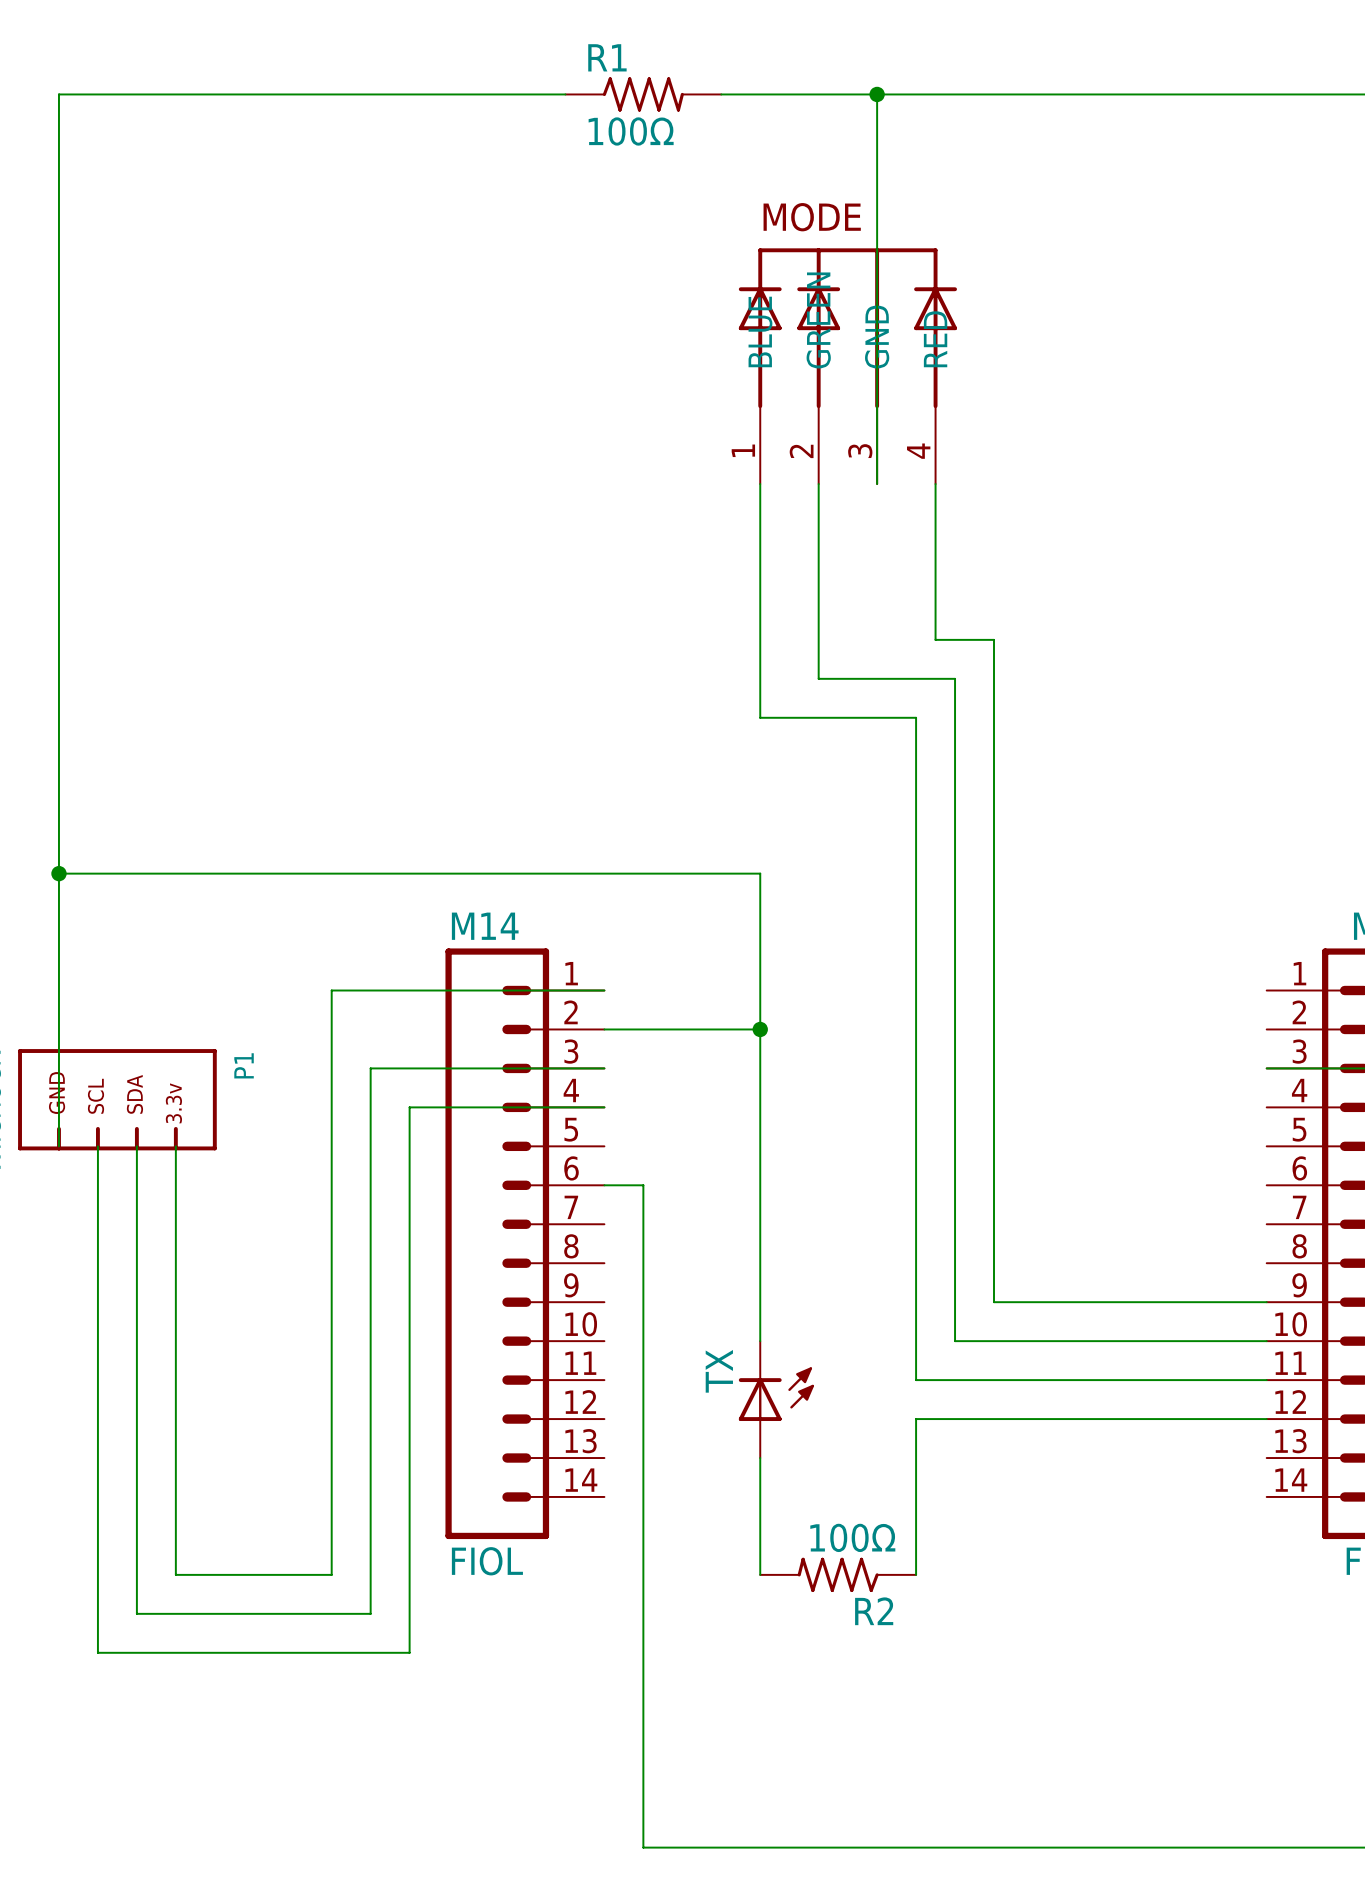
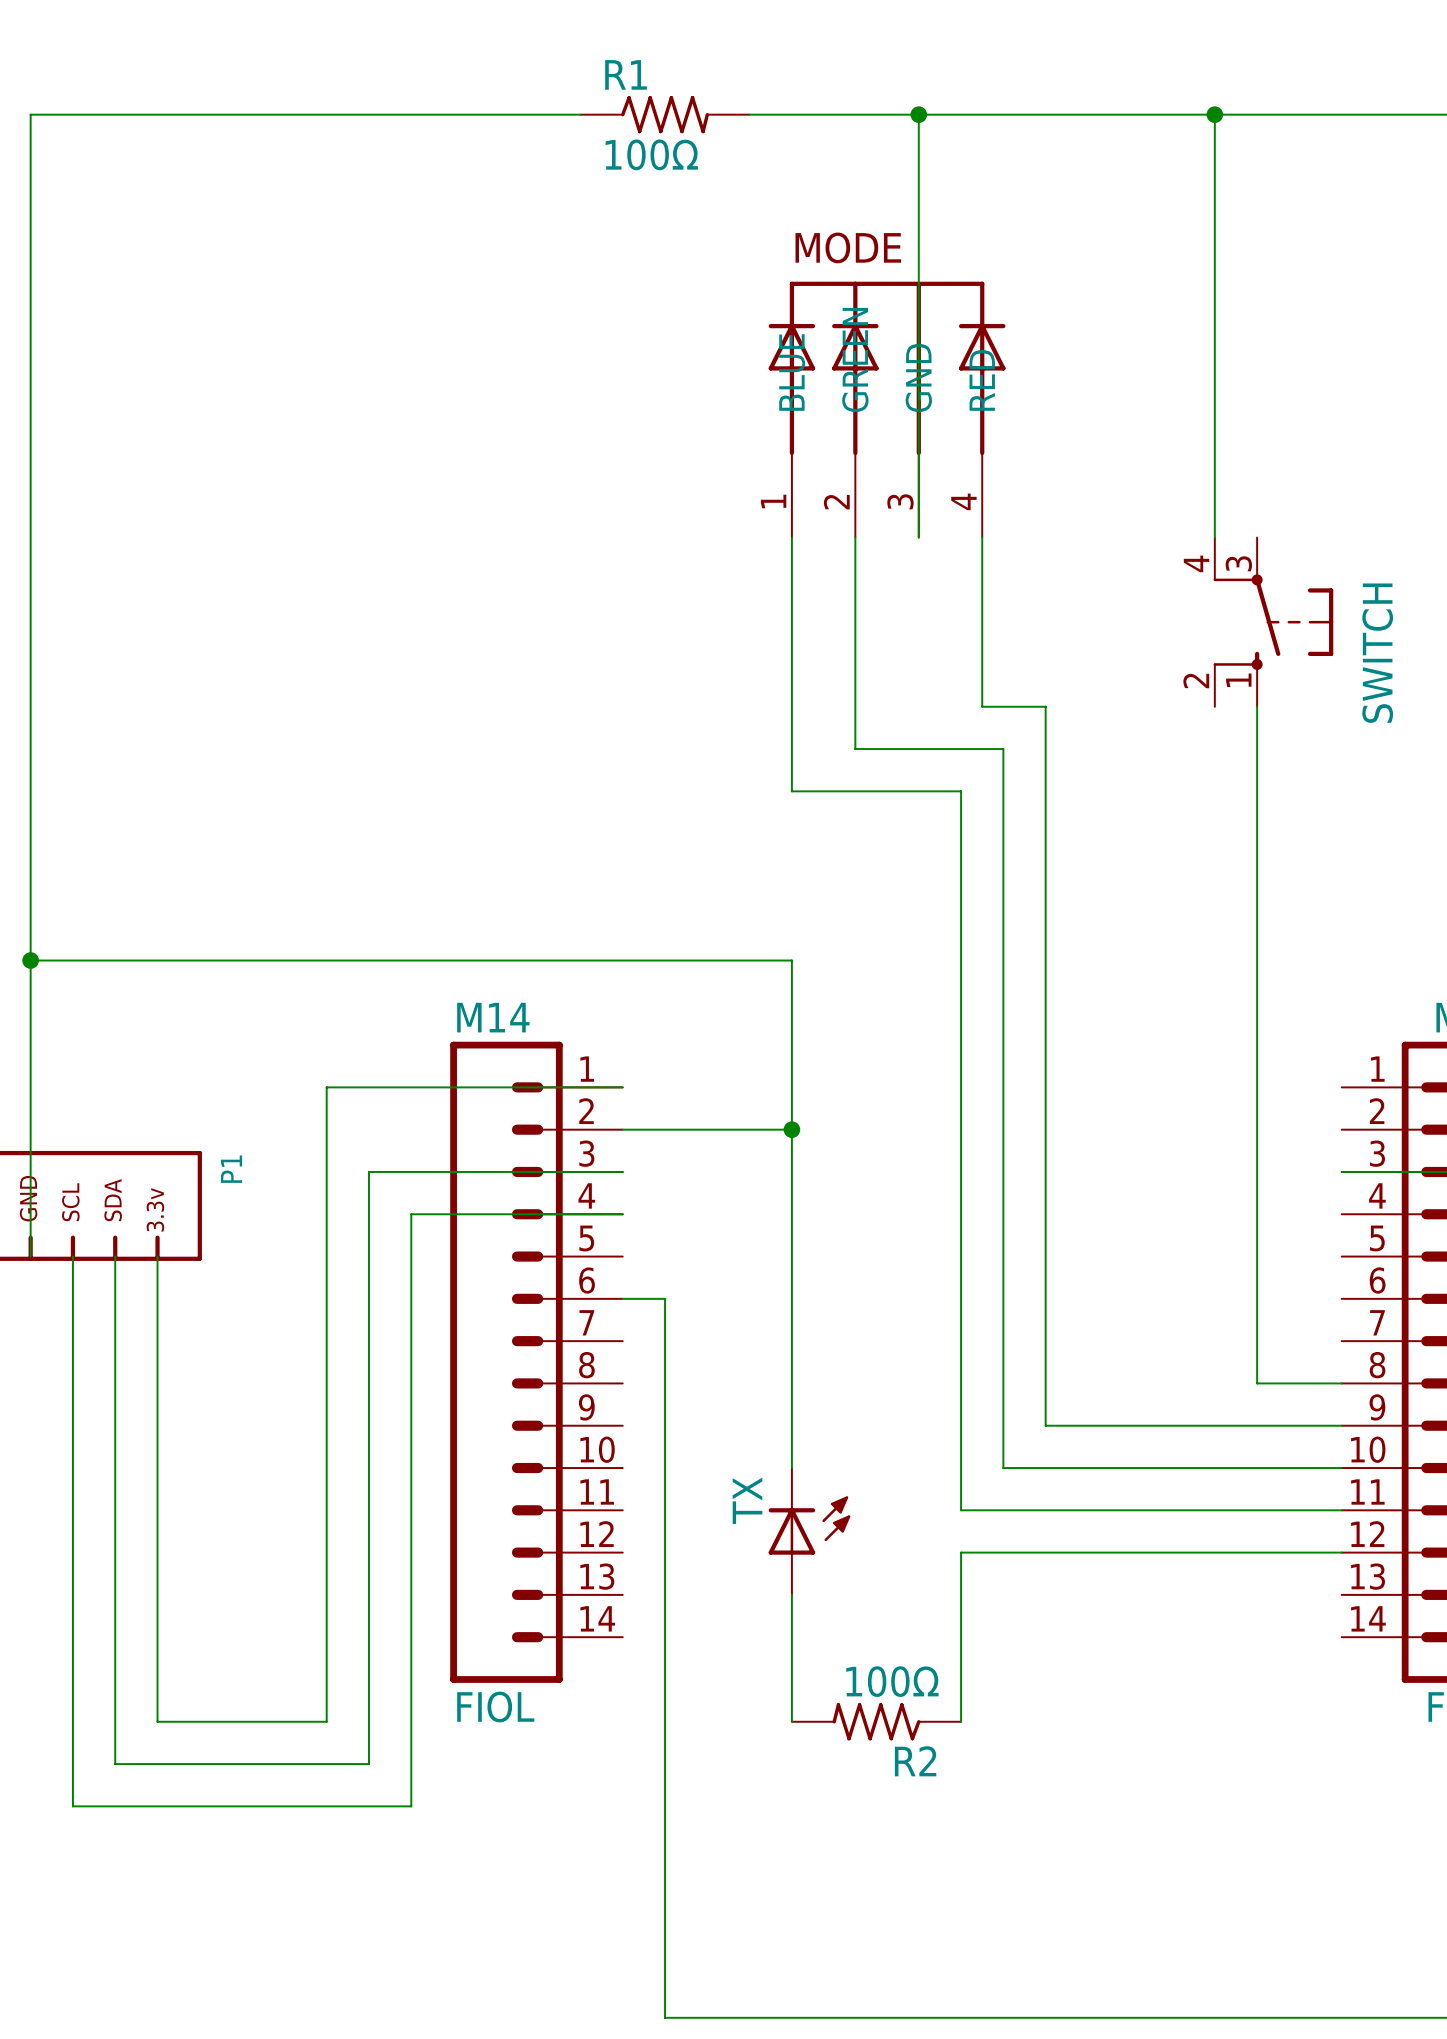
wire: none -> (1214, 114) (1214, 537)
junction: none -> (1214, 114)
SWITCH: none -> (1273, 622)
wire: none -> (1257, 706) (1257, 1383) (1341, 1383)

